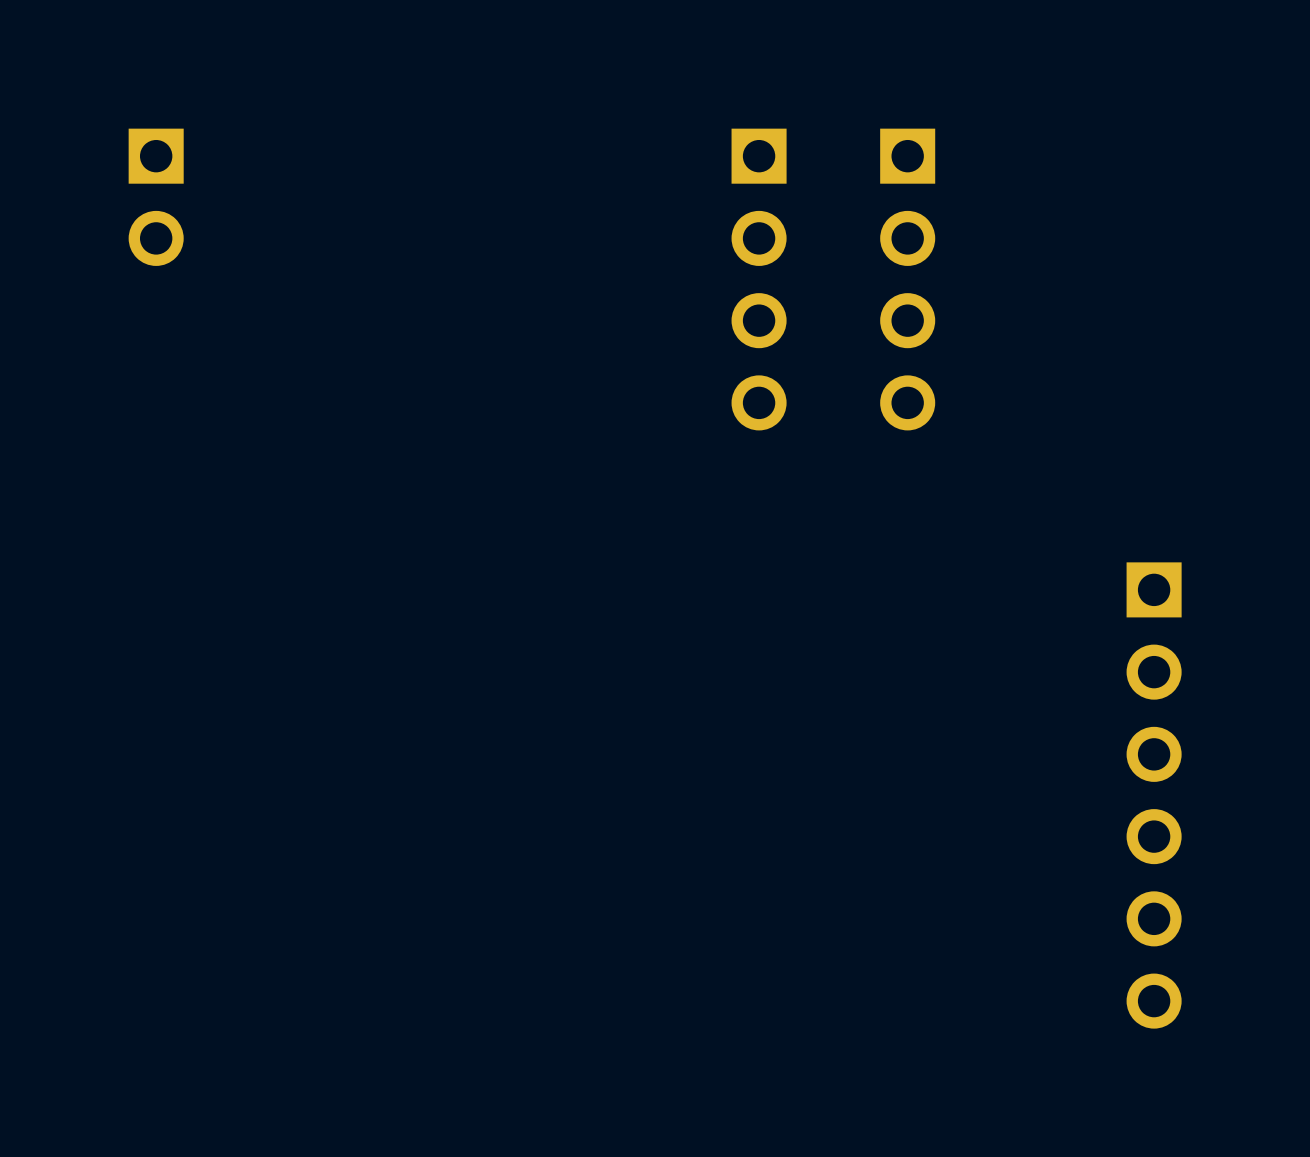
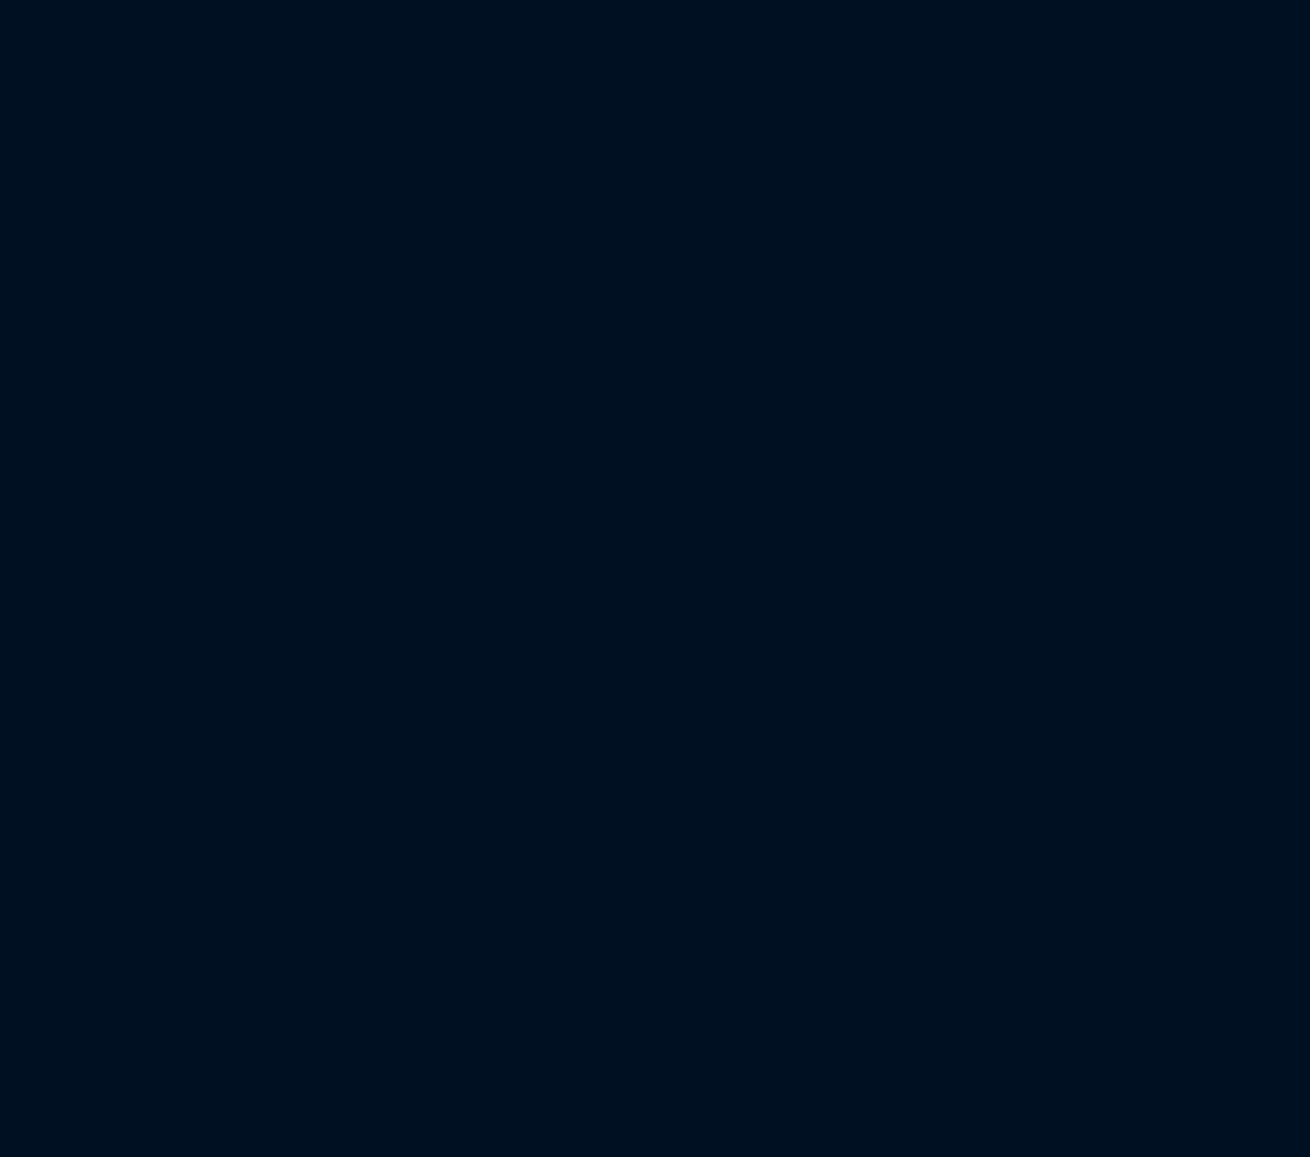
part: (156, 197) -> none
part: (759, 279) -> none
part: (907, 279) -> none
part: (1154, 795) -> none

